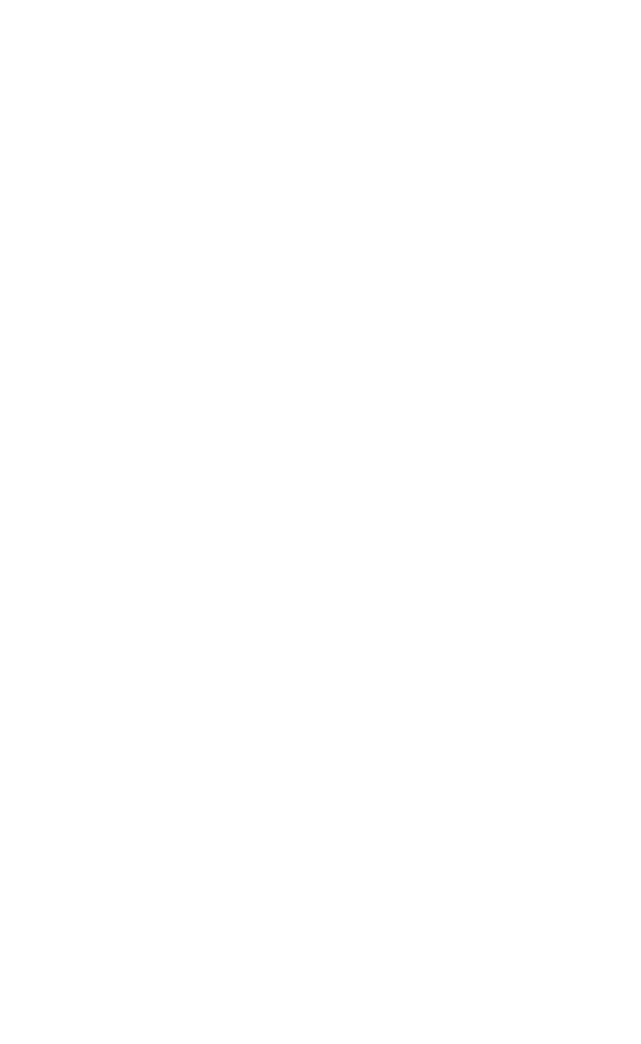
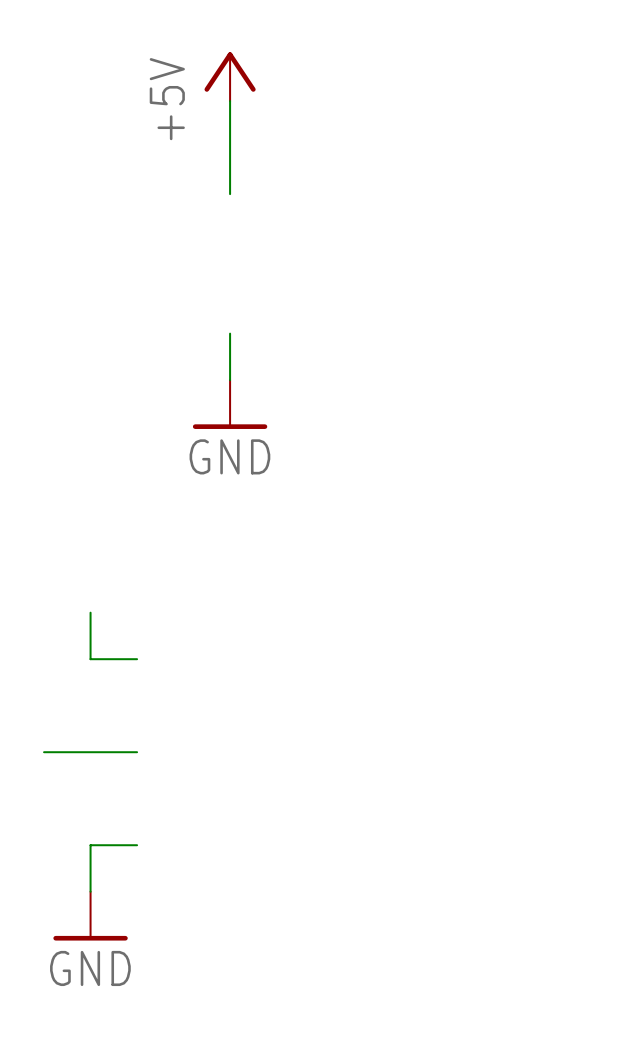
power symbol: none -> +5V (230, 76)
wire: none -> (230, 101) (230, 194)
wire: none -> (230, 333) (230, 380)
power symbol: none -> GND (230, 404)
wire: none -> (90, 612) (90, 659) (137, 659)
wire: none -> (44, 752) (137, 752)
wire: none -> (137, 845) (90, 845) (90, 891)
power symbol: none -> GND (90, 916)

